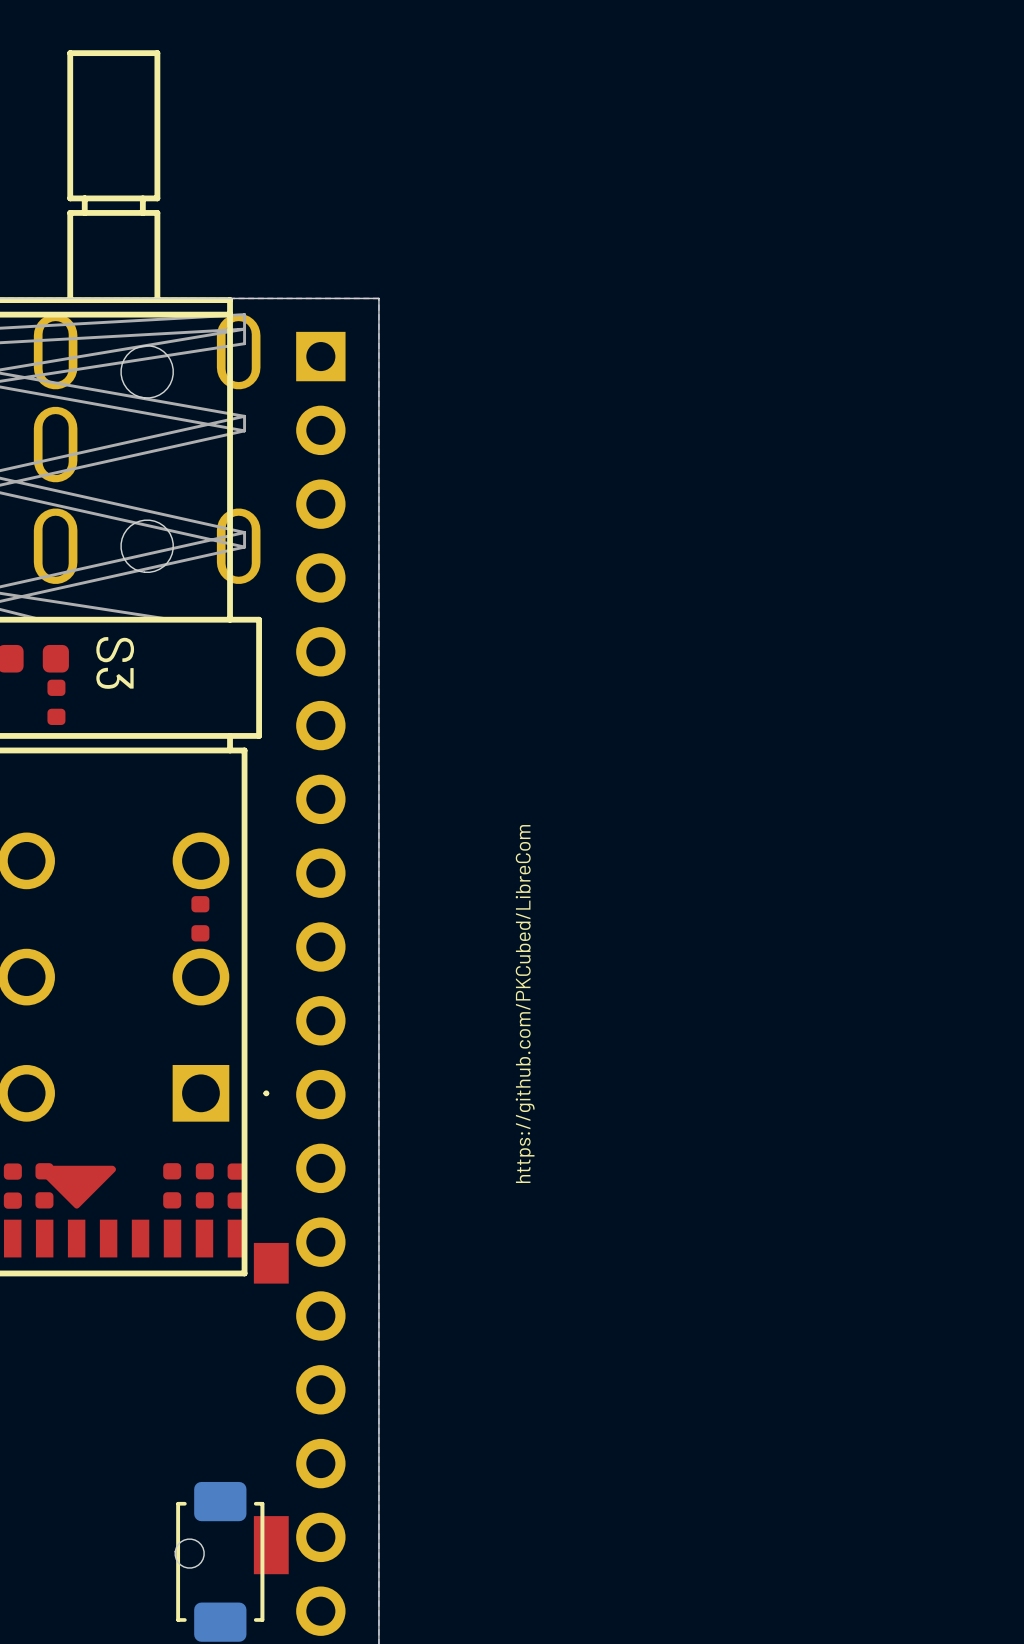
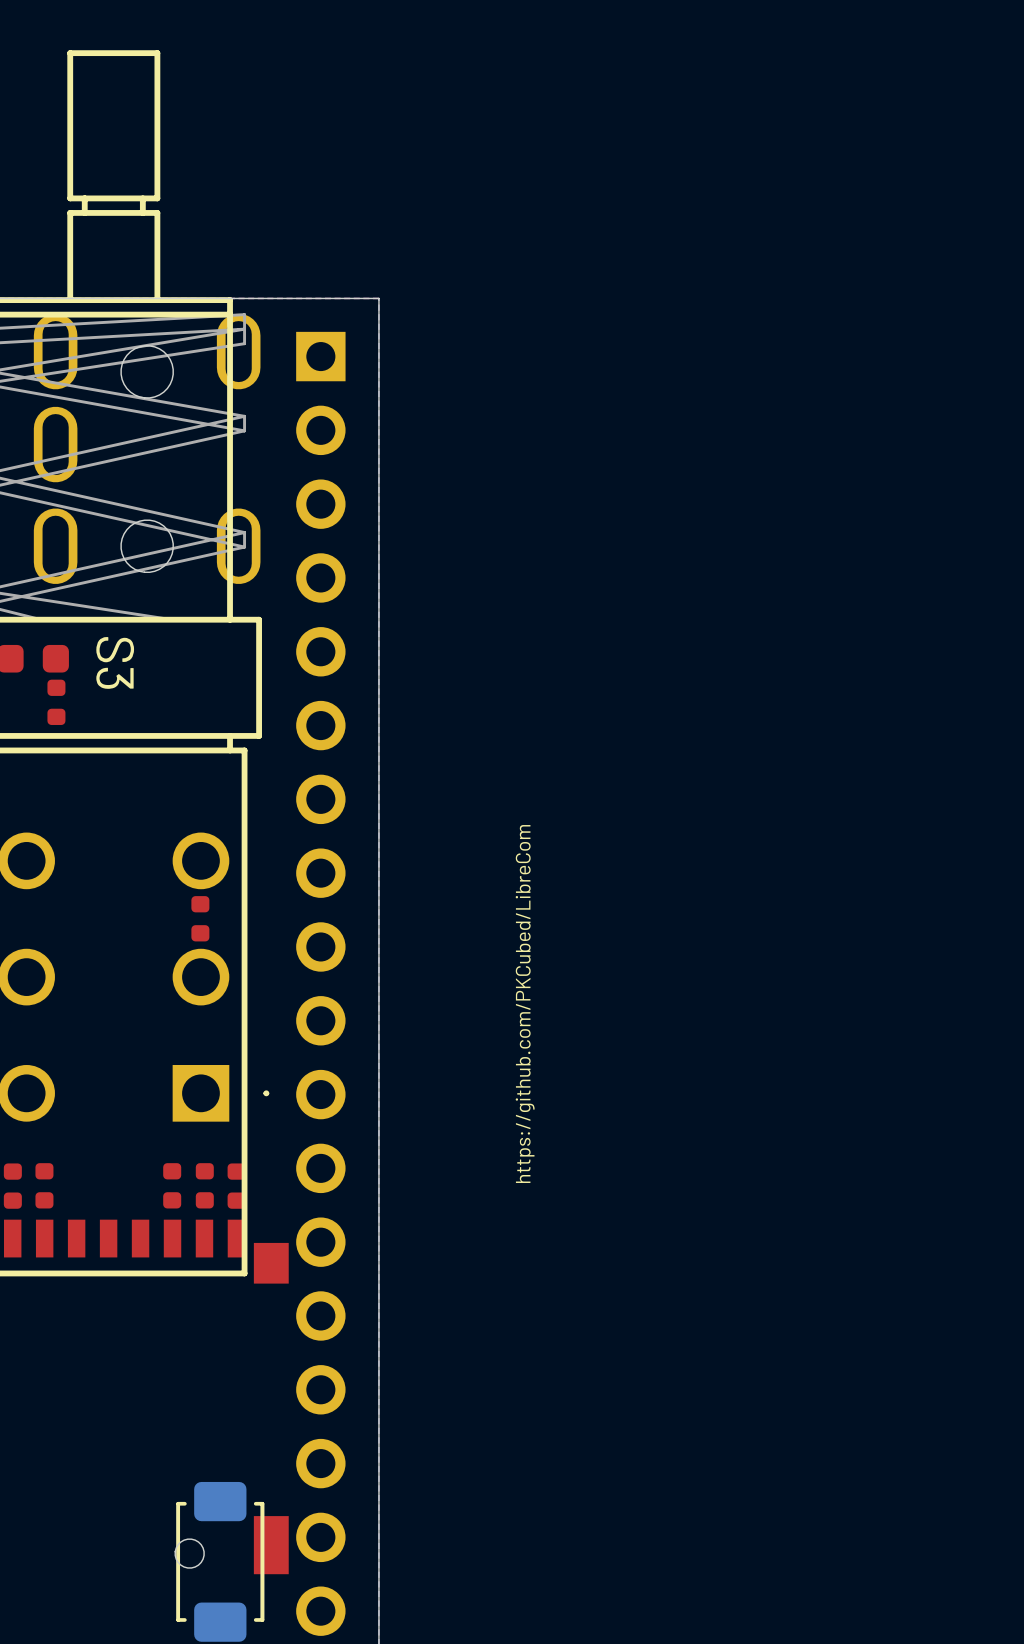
drawing: [45, 1165, 117, 1209] -> none

